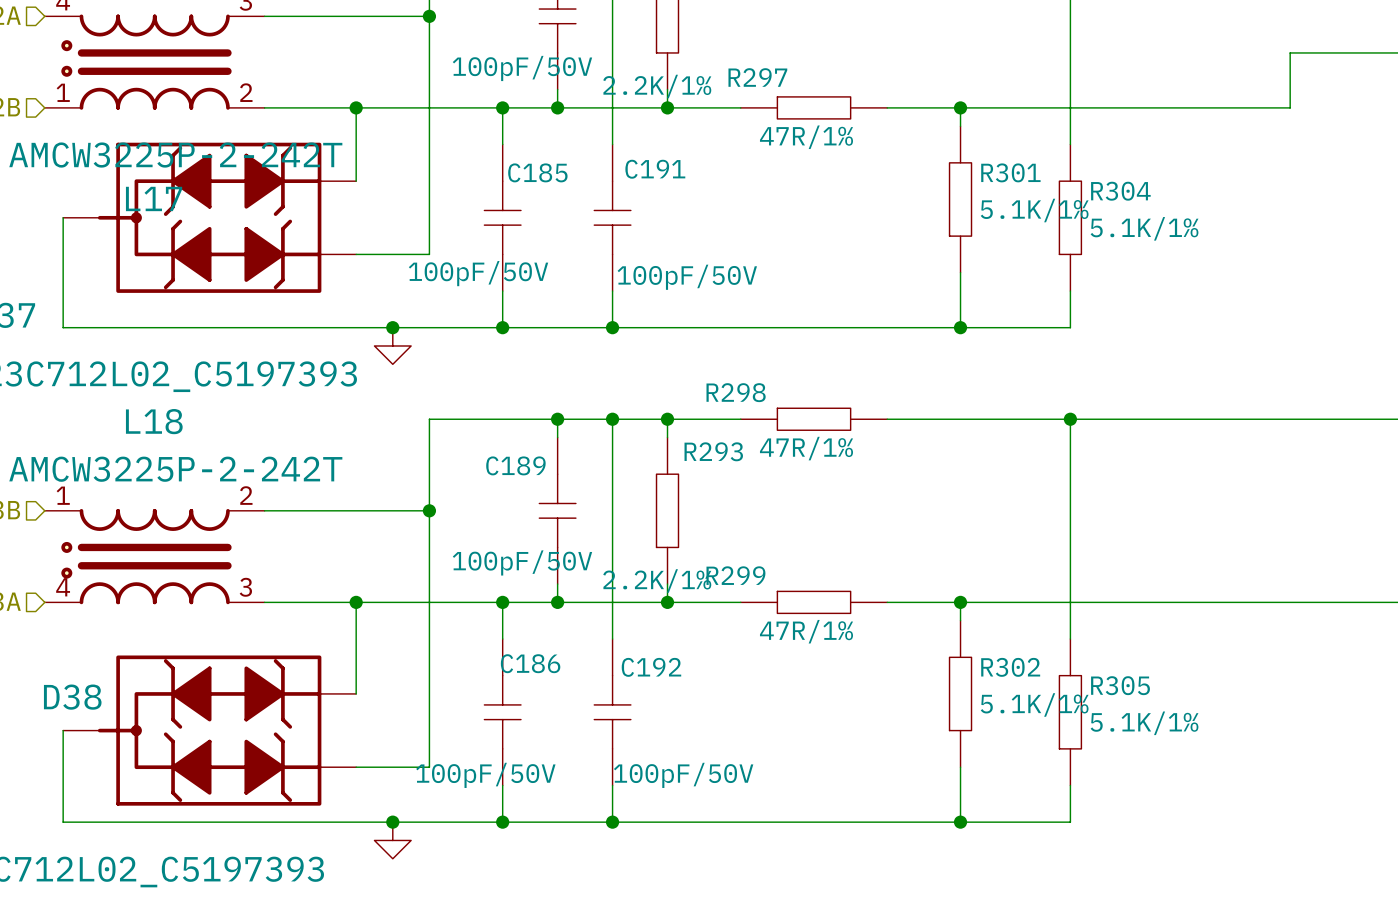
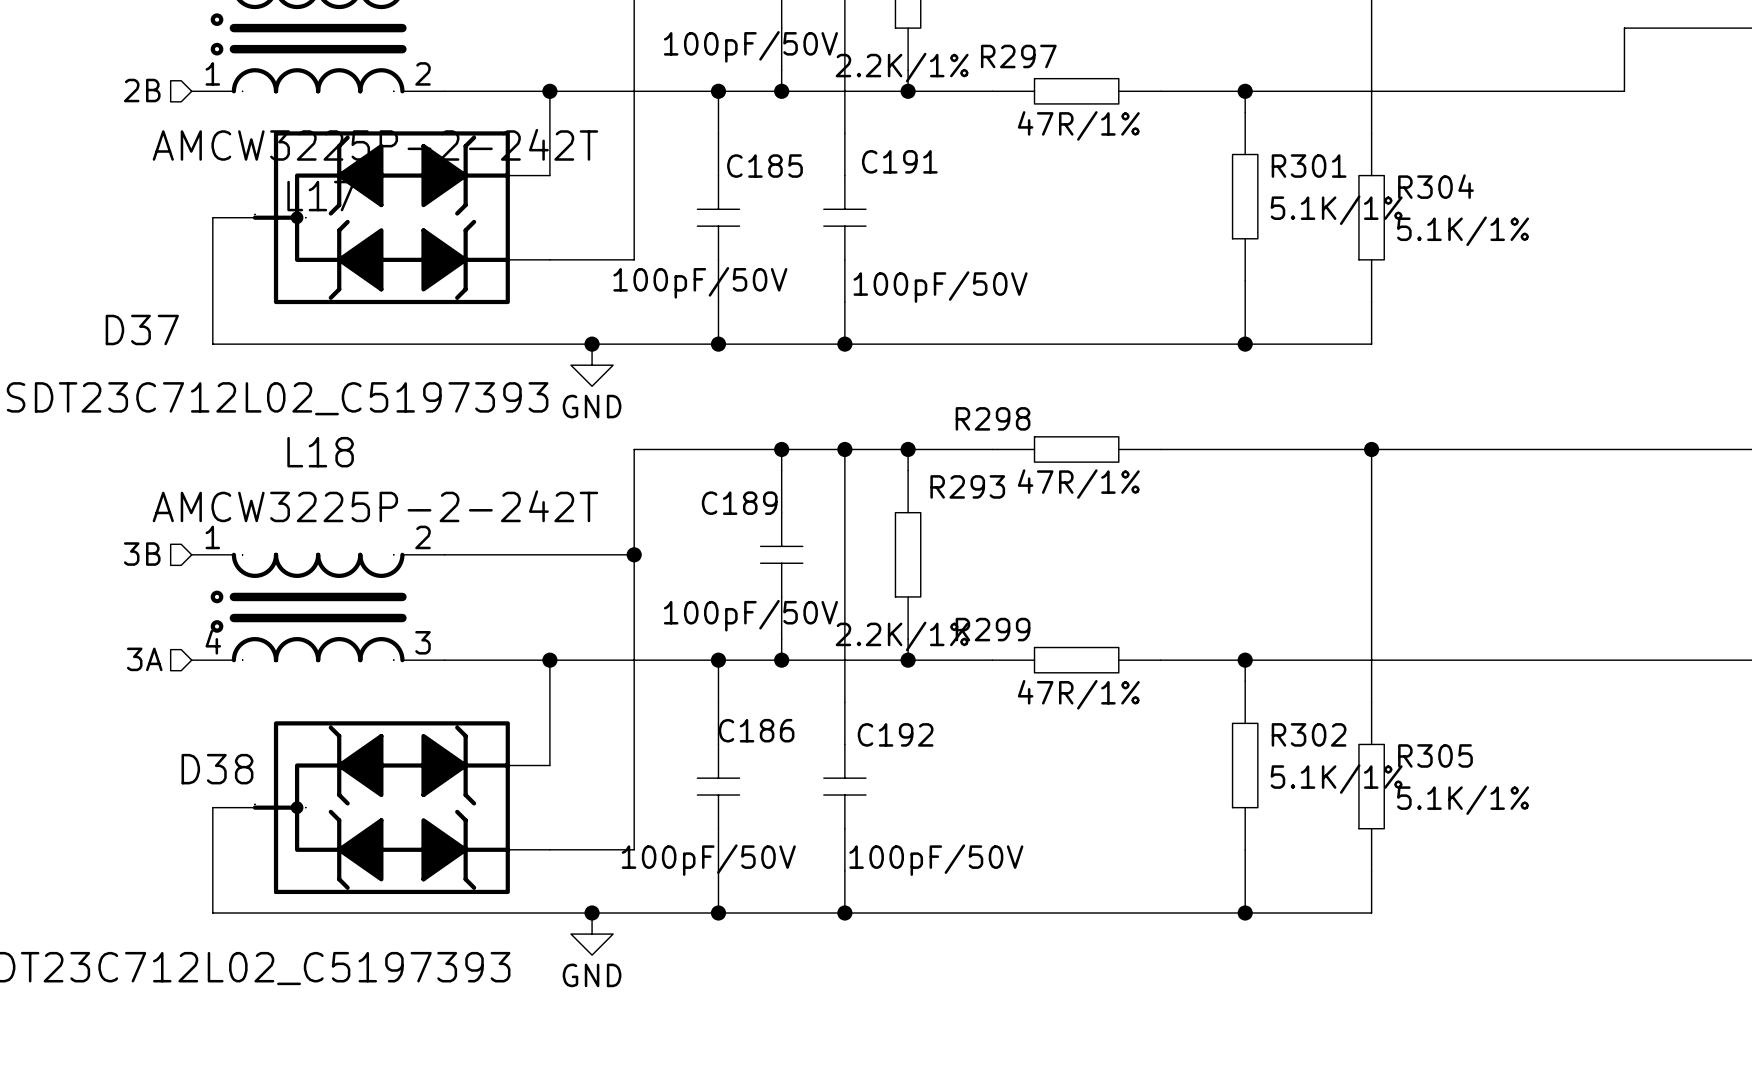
power symbol text: none -> GND (592, 406)
power symbol text: none -> GND (592, 975)

